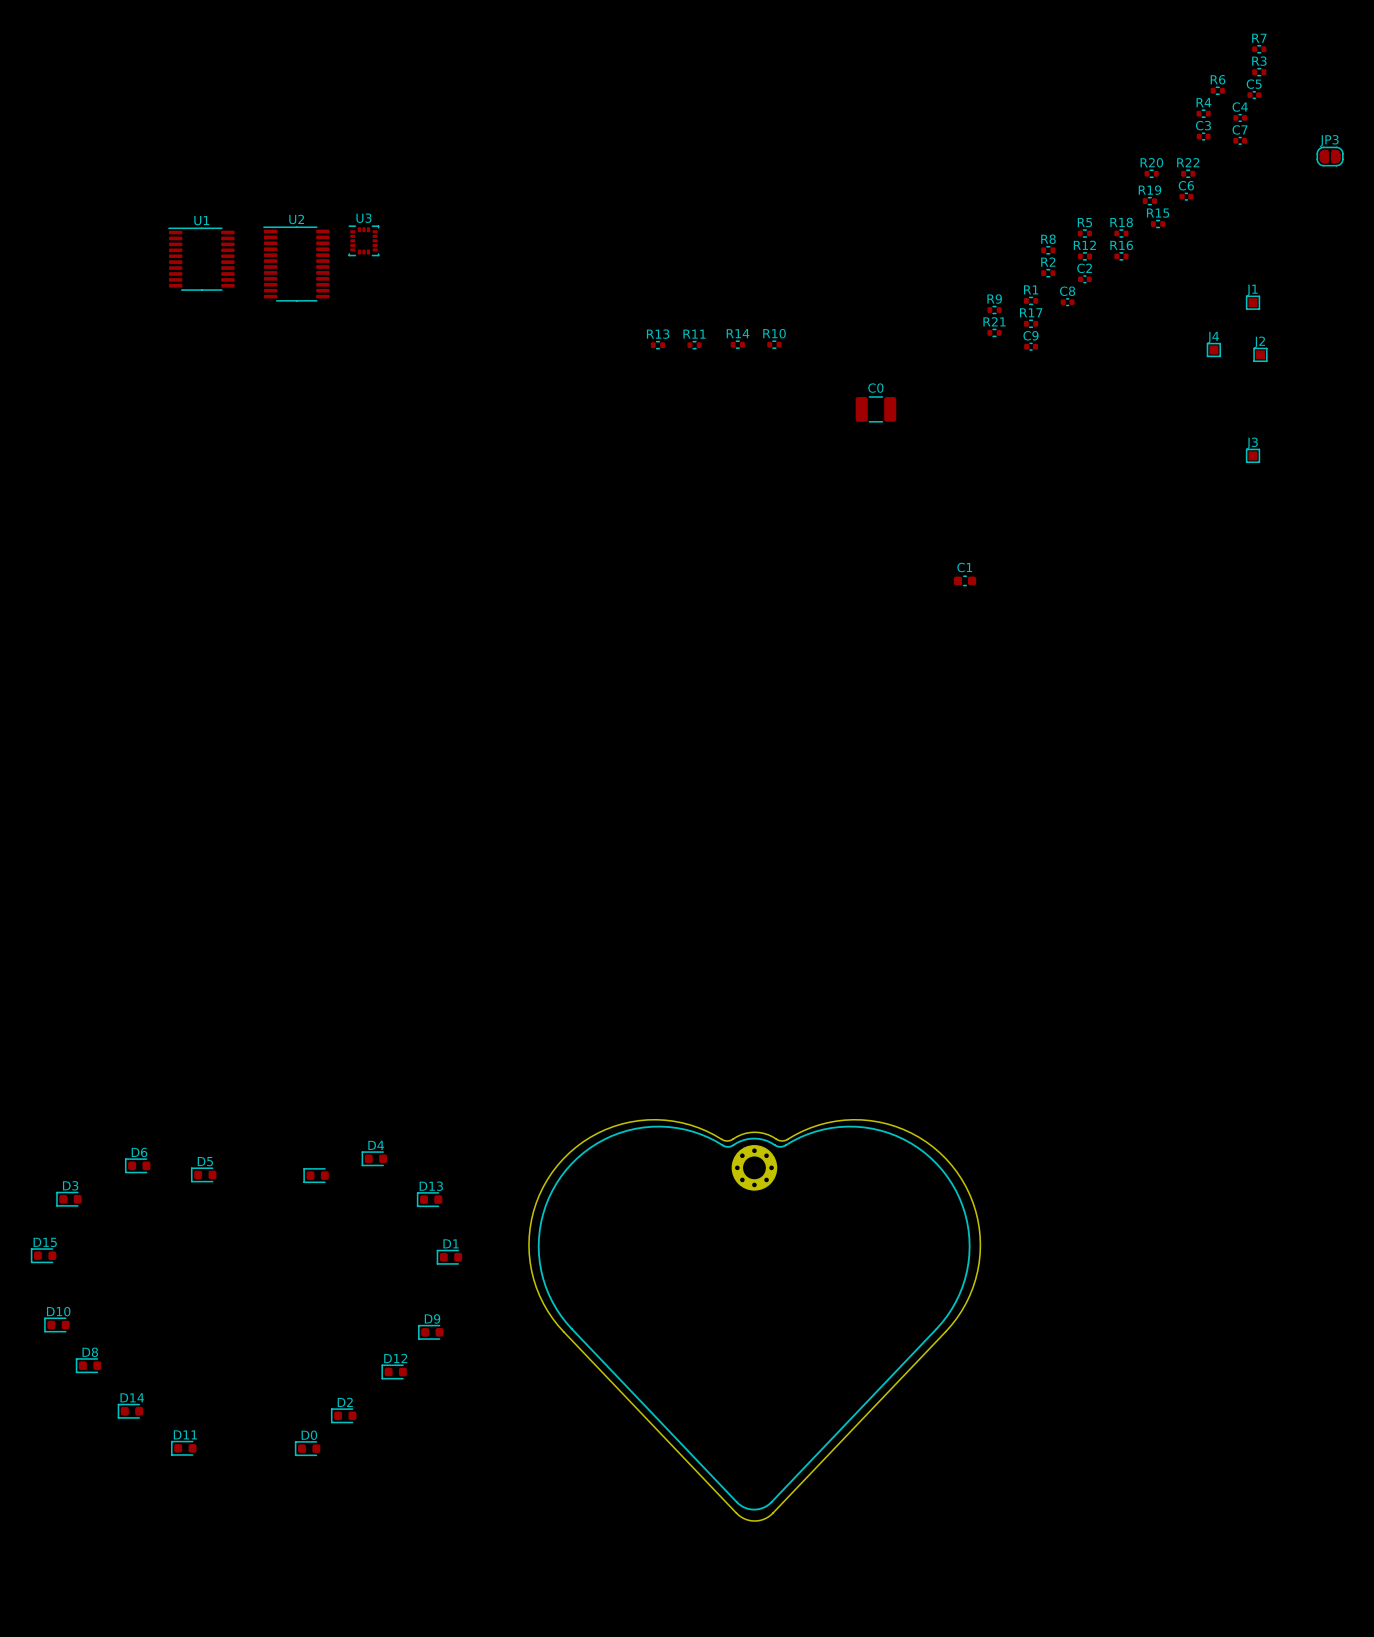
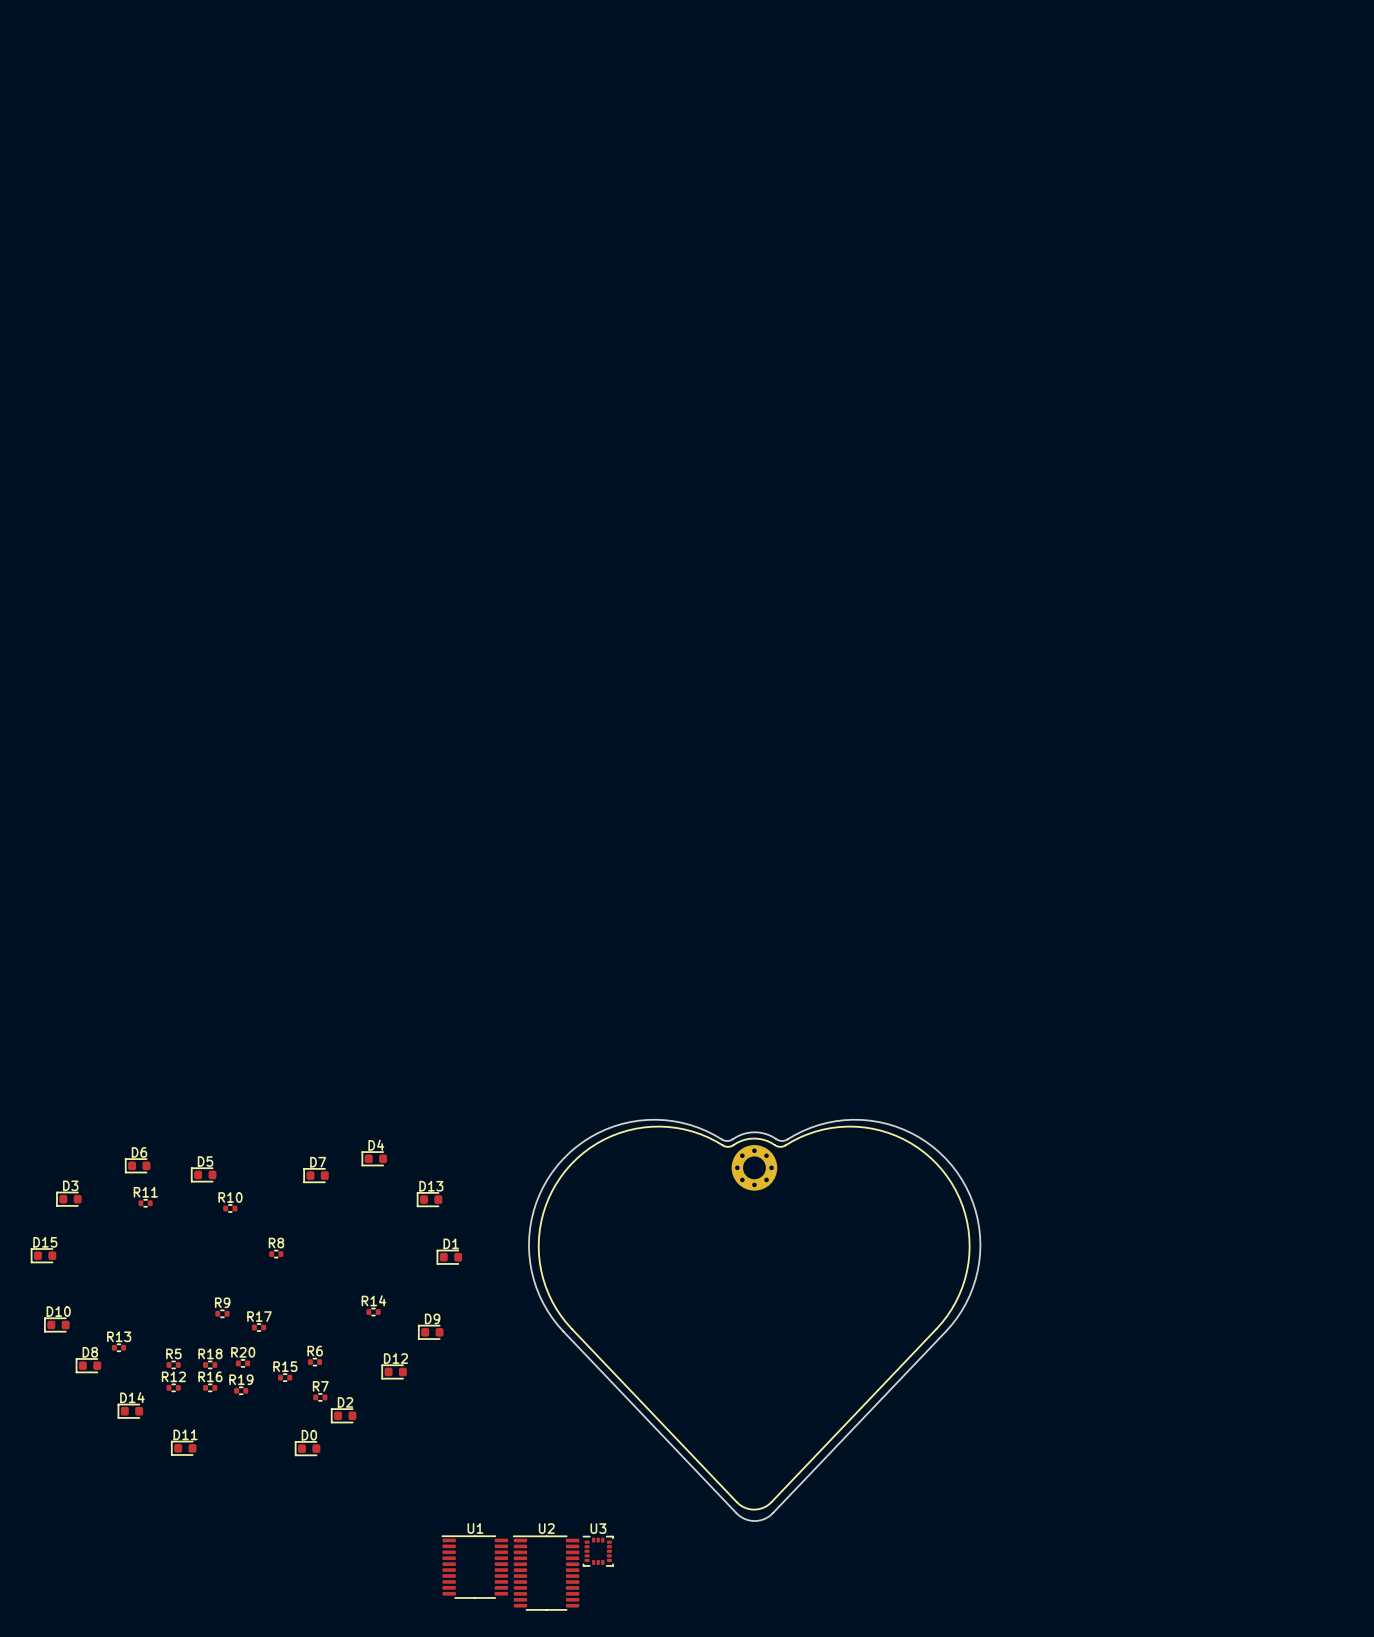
R7 position: (1259, 49) -> (320, 1397)
R3: (1259, 72) -> none
R6 position: (1217, 90) -> (314, 1362)
C5: (1254, 95) -> none
R4: (1203, 113) -> none
C4: (1240, 117) -> none
C3: (1203, 136) -> none
C7: (1240, 140) -> none
JP3: (1330, 156) -> none
R20 position: (1151, 173) -> (242, 1363)
R22: (1188, 173) -> none
C6: (1186, 196) -> none
R19 position: (1149, 201) -> (241, 1390)
R15 position: (1158, 224) -> (285, 1377)
R5 position: (1084, 233) -> (173, 1364)
R18 position: (1121, 233) -> (210, 1364)
U3 position: (363, 240) -> (598, 1551)
R8 position: (1048, 250) -> (276, 1254)
R12 position: (1084, 256) -> (173, 1387)
R16 position: (1121, 256) -> (210, 1387)
U1 position: (201, 259) -> (474, 1567)
U2 position: (296, 264) -> (546, 1573)
R2: (1048, 273) -> none
C2: (1084, 279) -> none
R1: (1031, 300) -> none
C8: (1067, 302) -> none
J1: (1253, 302) -> none
R9 position: (994, 310) -> (222, 1313)
R17 position: (1031, 323) -> (259, 1327)
R21: (994, 332) -> none
R14 position: (737, 344) -> (373, 1312)
R10 position: (774, 344) -> (230, 1208)
R13 position: (657, 345) -> (118, 1347)
R11 position: (694, 345) -> (145, 1203)
C9: (1031, 346) -> none
J4: (1213, 349) -> none
J2: (1260, 354) -> none
C0: (875, 409) -> none
J3: (1253, 455) -> none
C1: (964, 580) -> none
D7 name: none -> D7 (318, 1162)

